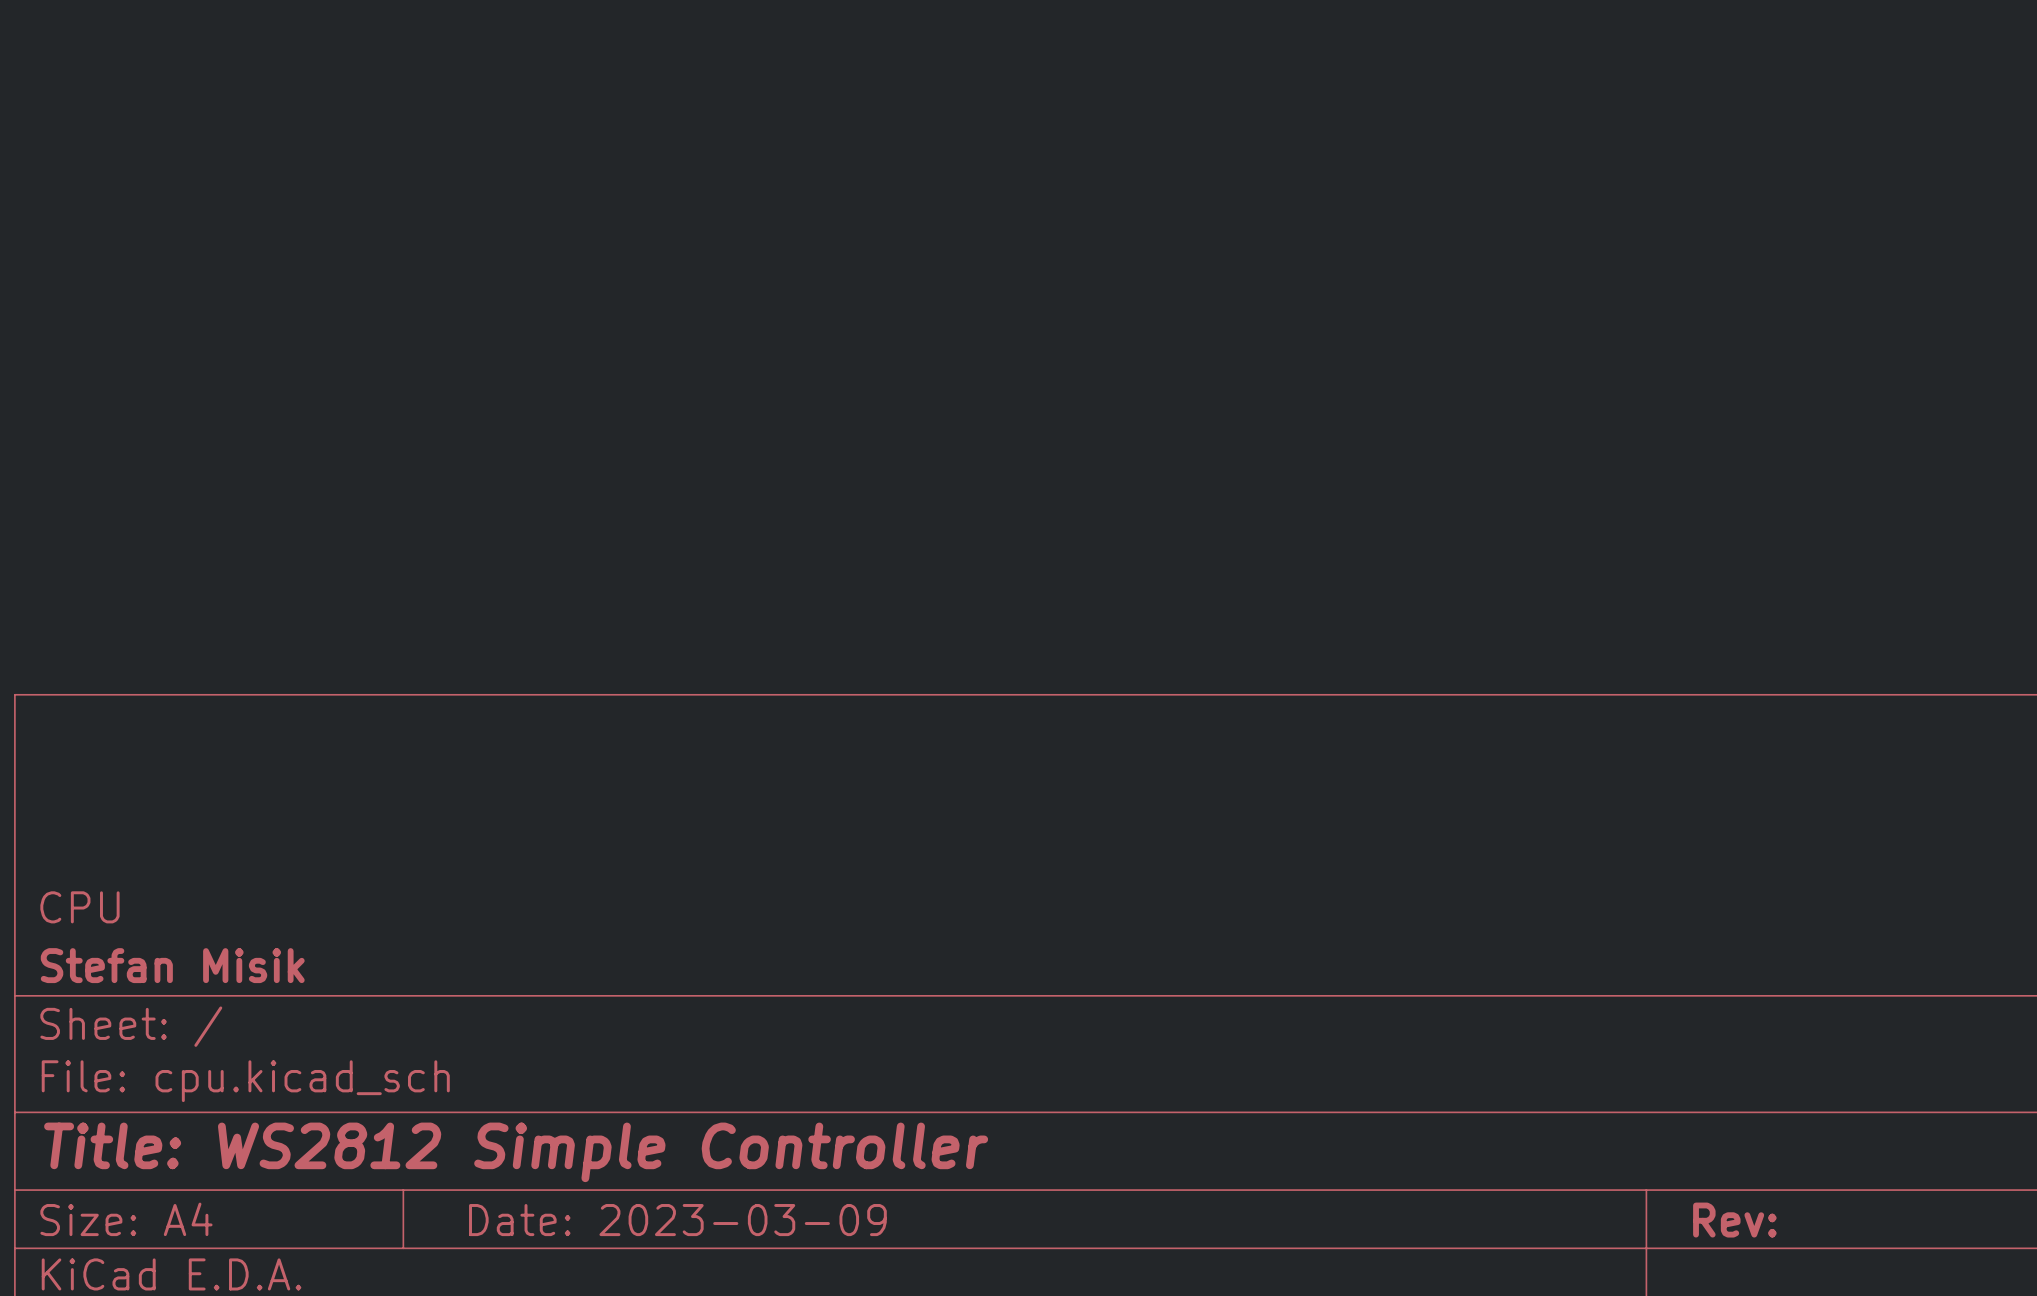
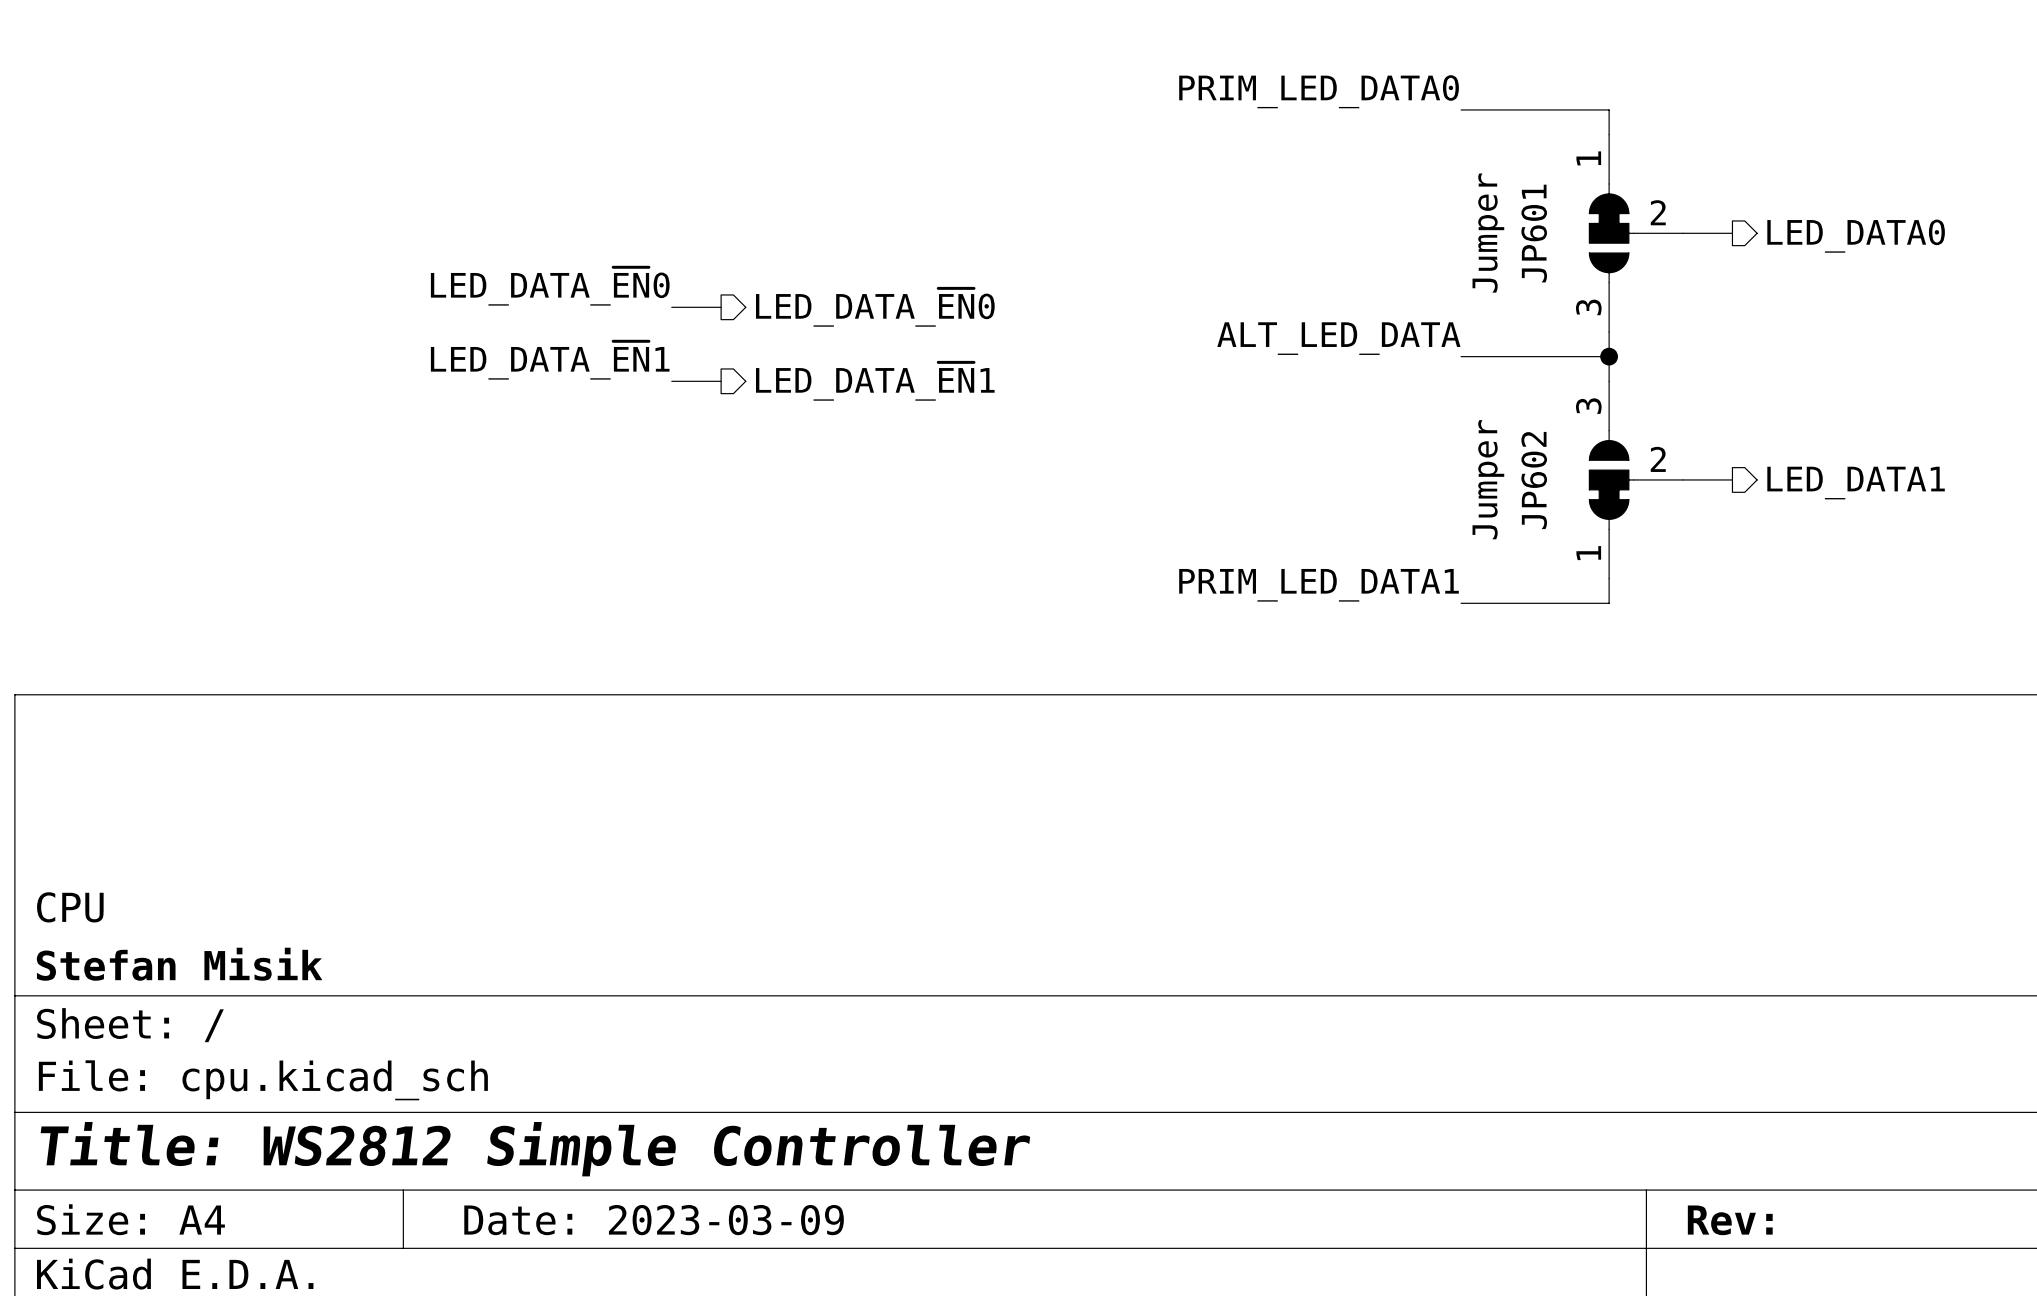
label: none -> PRIM_LED_DATA0 (1319, 91)
wire: none -> (1461, 109) (1609, 109) (1609, 134)
JP601: none -> Jumper (1636, 233)
wire: none -> (1683, 233) (1732, 233)
hierarchical label: none -> LED_DATA0 (1856, 236)
label: none -> LED_DATA_~{EN}0 (550, 286)
hierarchical label: none -> LED_DATA_~{EN}0 (875, 307)
wire: none -> (671, 307) (721, 307)
wire: none -> (1609, 331) (1609, 381)
label: none -> ALT_LED_DATA (1338, 338)
wire: none -> (1461, 356) (1609, 356)
junction: none -> (1609, 356)
label: none -> LED_DATA_~{EN}1 (550, 360)
hierarchical label: none -> LED_DATA_~{EN}1 (875, 381)
wire: none -> (671, 381) (721, 381)
JP602: none -> Jumper (1636, 479)
wire: none -> (1683, 479) (1732, 479)
hierarchical label: none -> LED_DATA1 (1856, 483)
wire: none -> (1609, 578) (1609, 603) (1461, 603)
label: none -> PRIM_LED_DATA1 (1319, 585)

